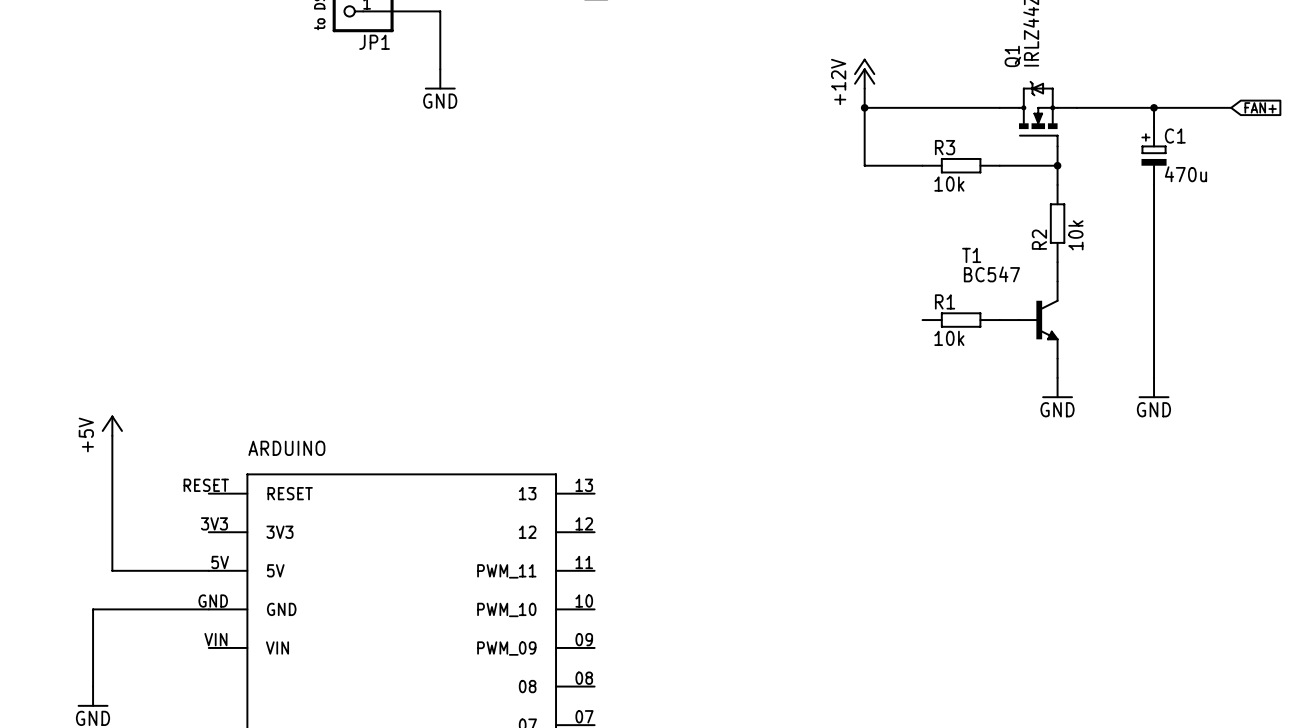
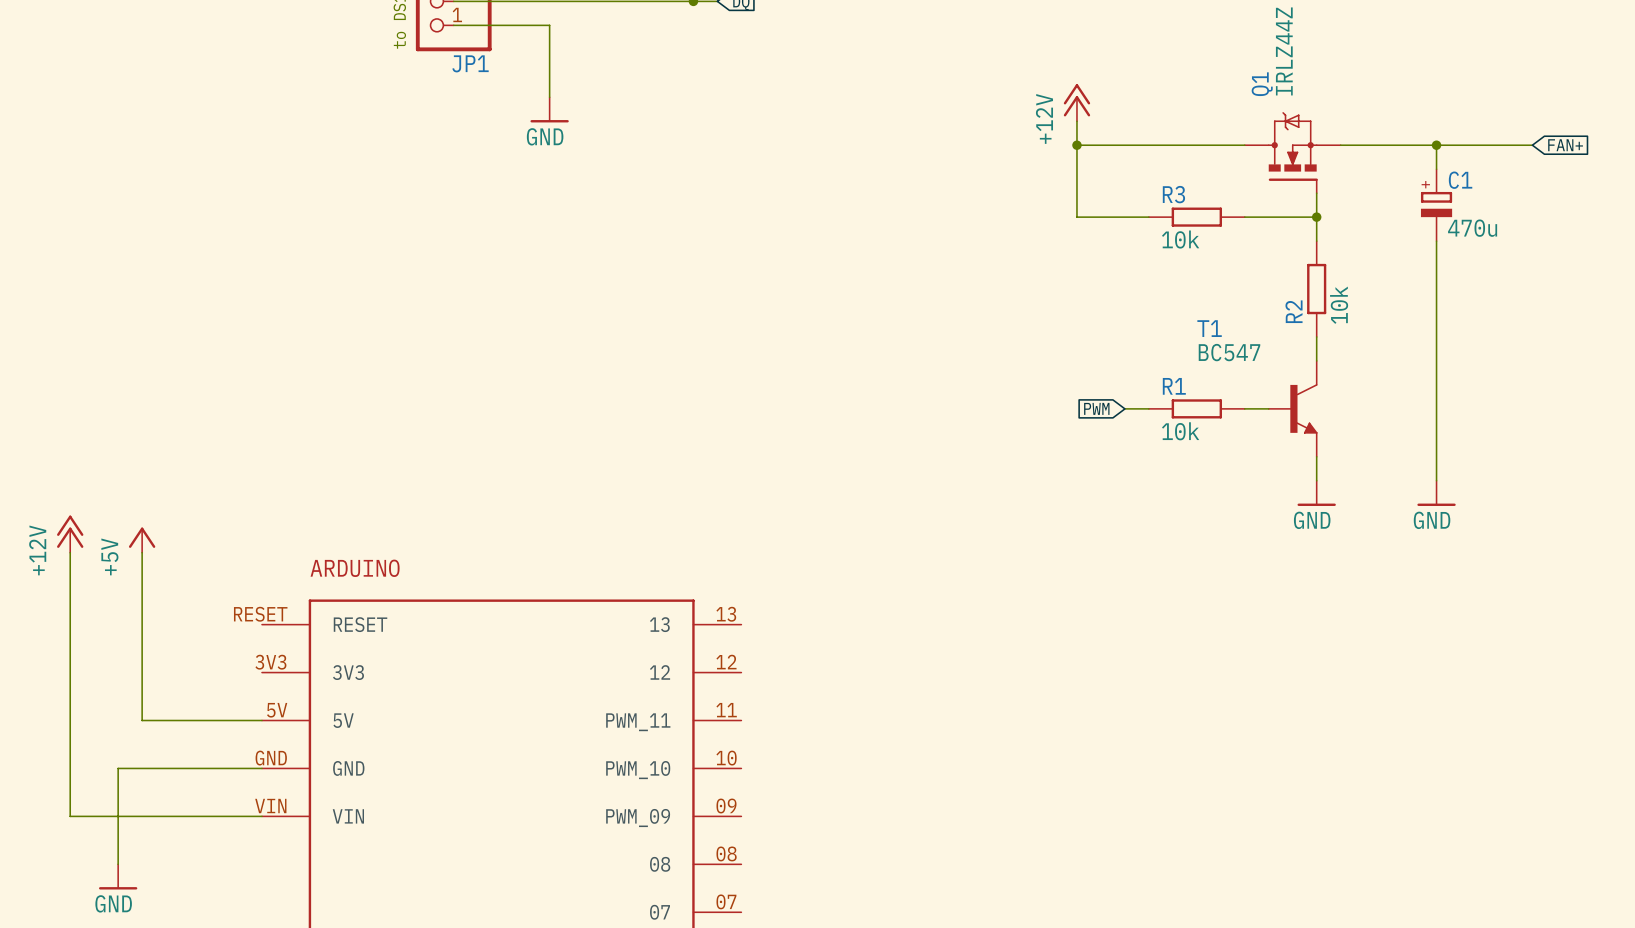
global label: none -> PWM (1096, 408)
wire: none -> (1124, 408) (1148, 408)
power symbol: none -> +12V (70, 534)
wire: none -> (70, 552) (70, 816) (261, 816)

